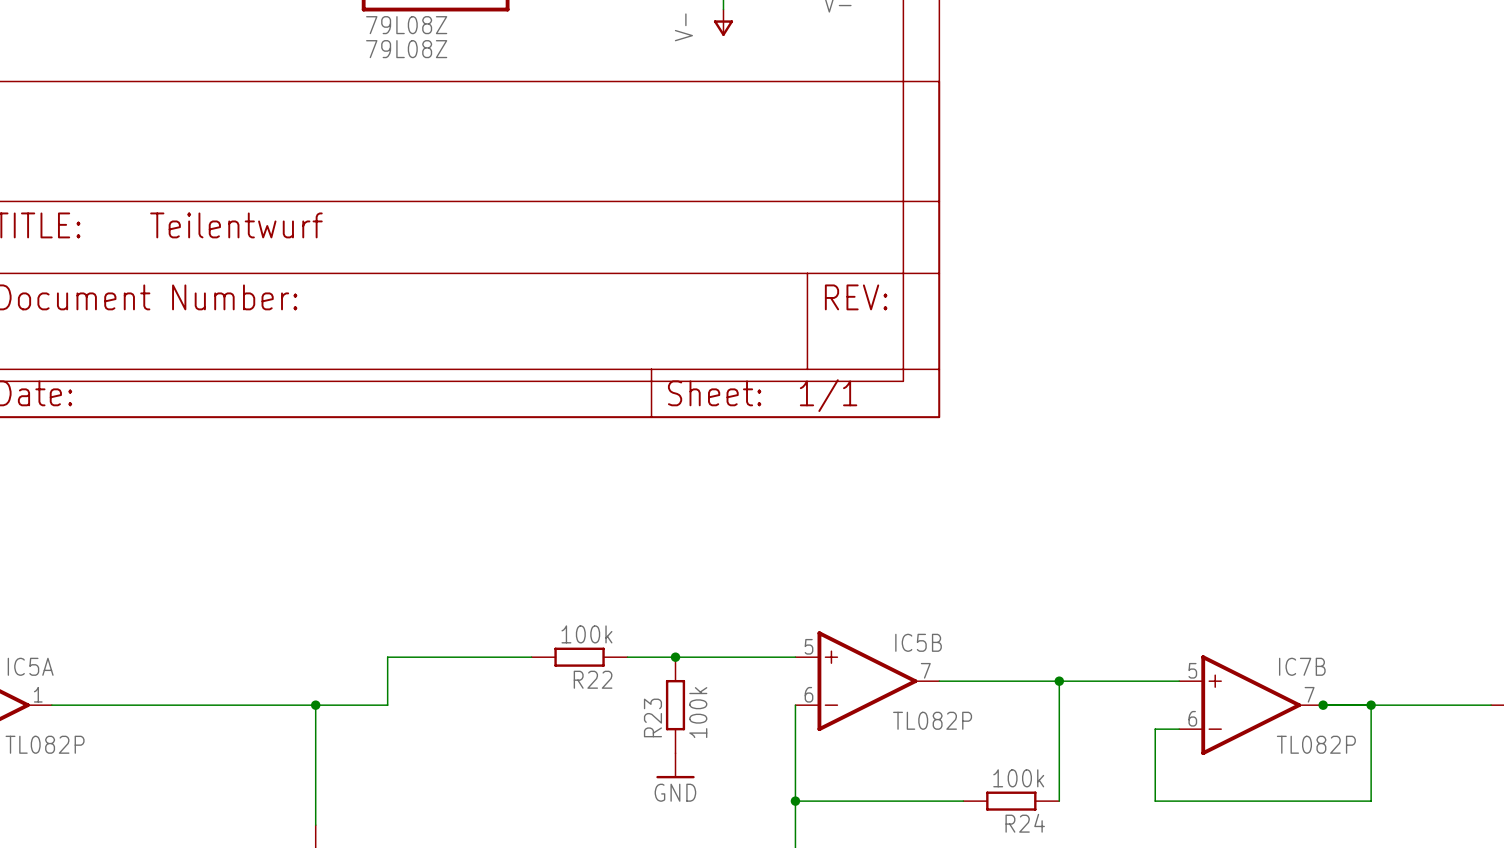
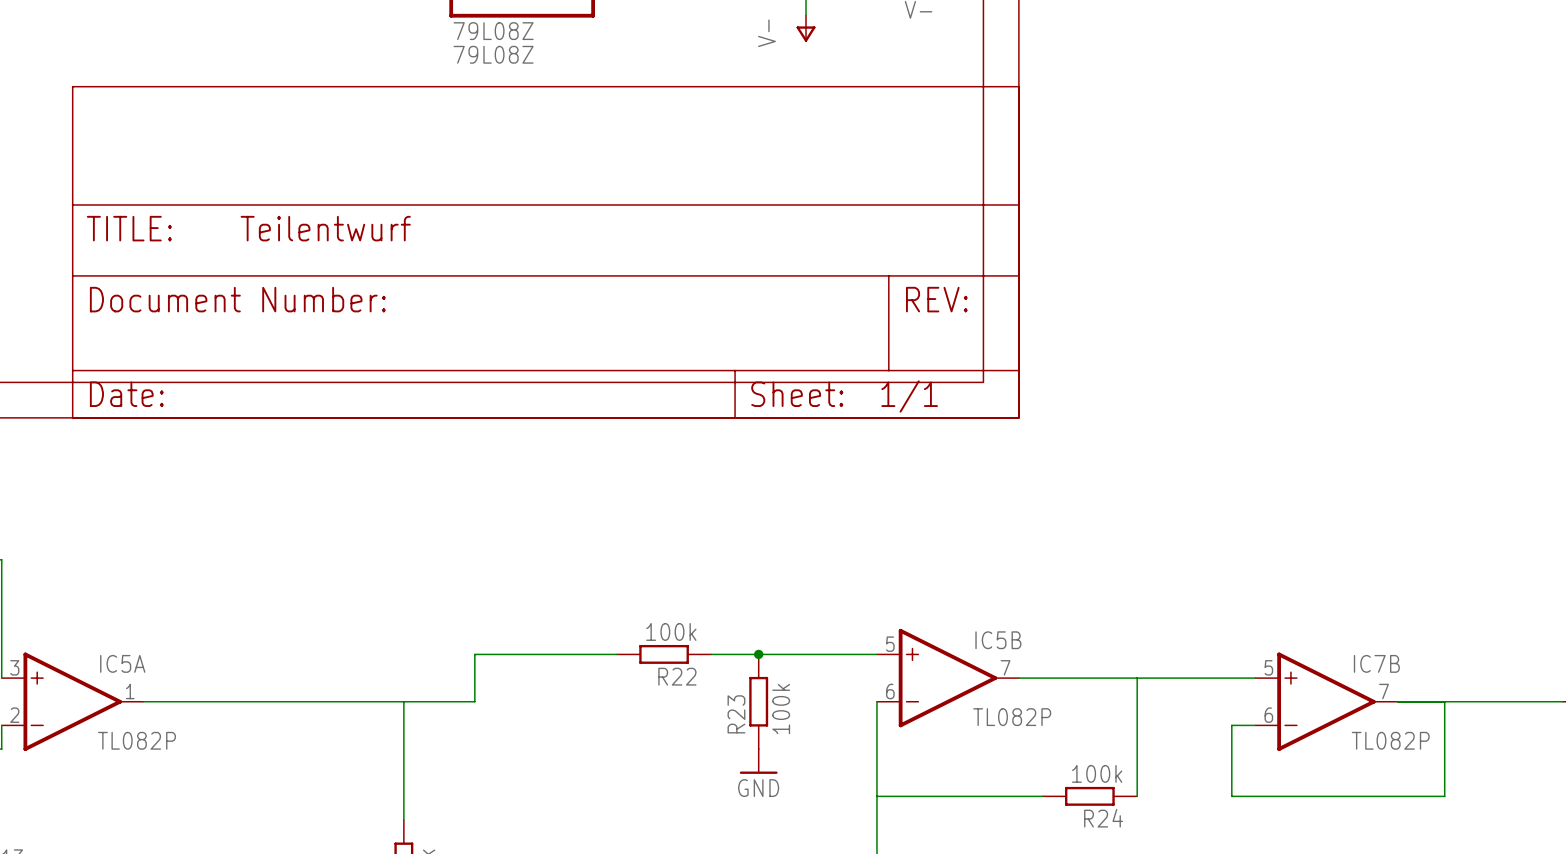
junction: (1059, 681) -> none
junction: (315, 705) -> none
junction: (1323, 705) -> none
junction: (1371, 705) -> none
junction: (795, 801) -> none

